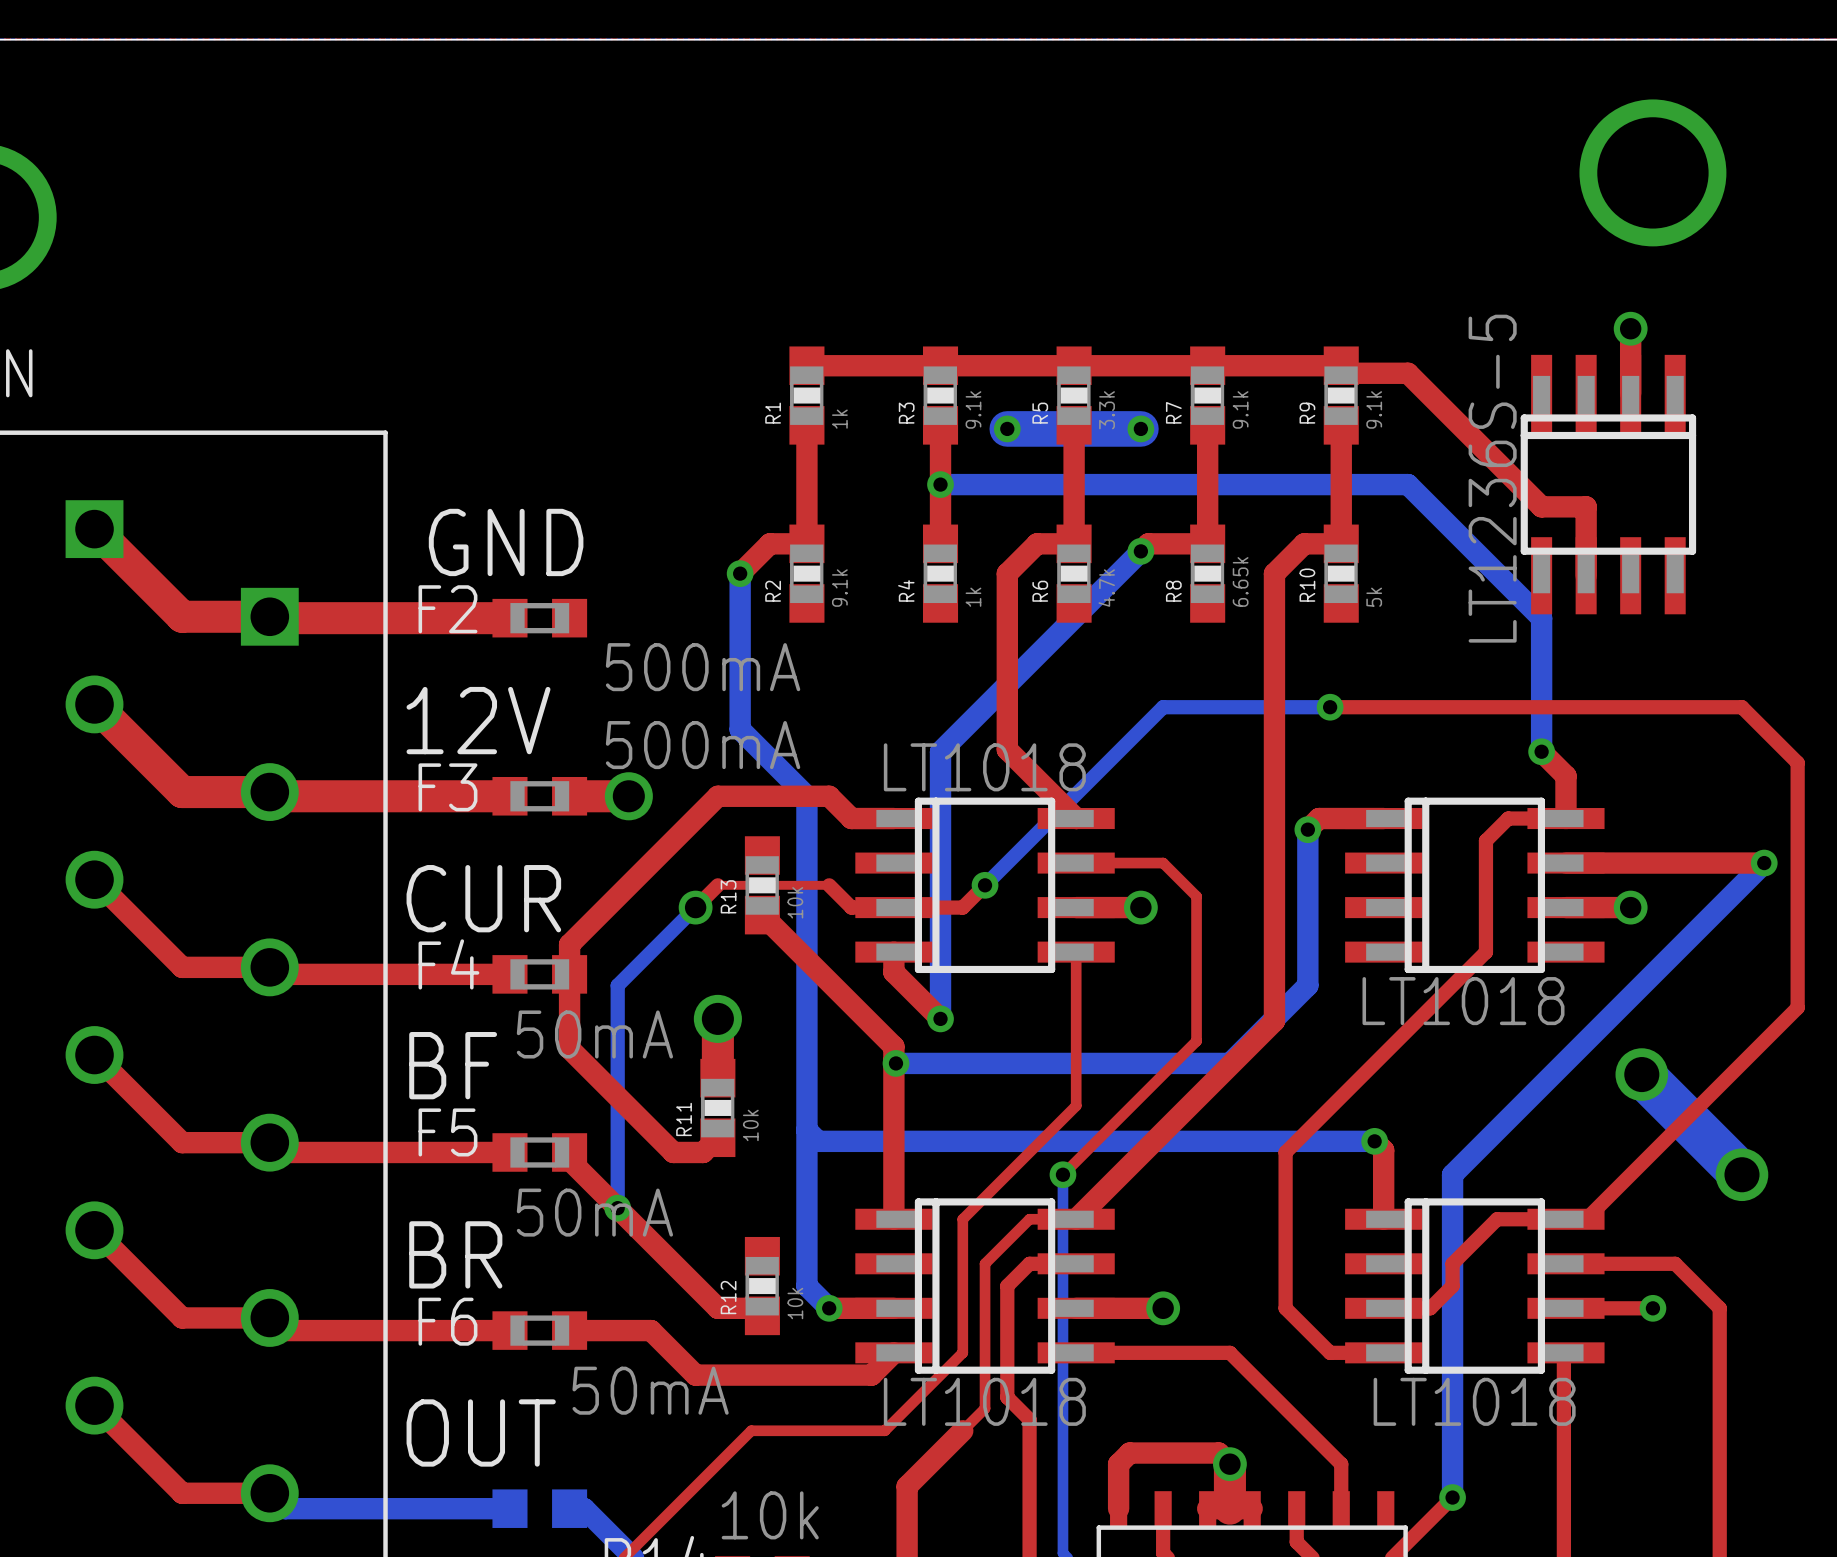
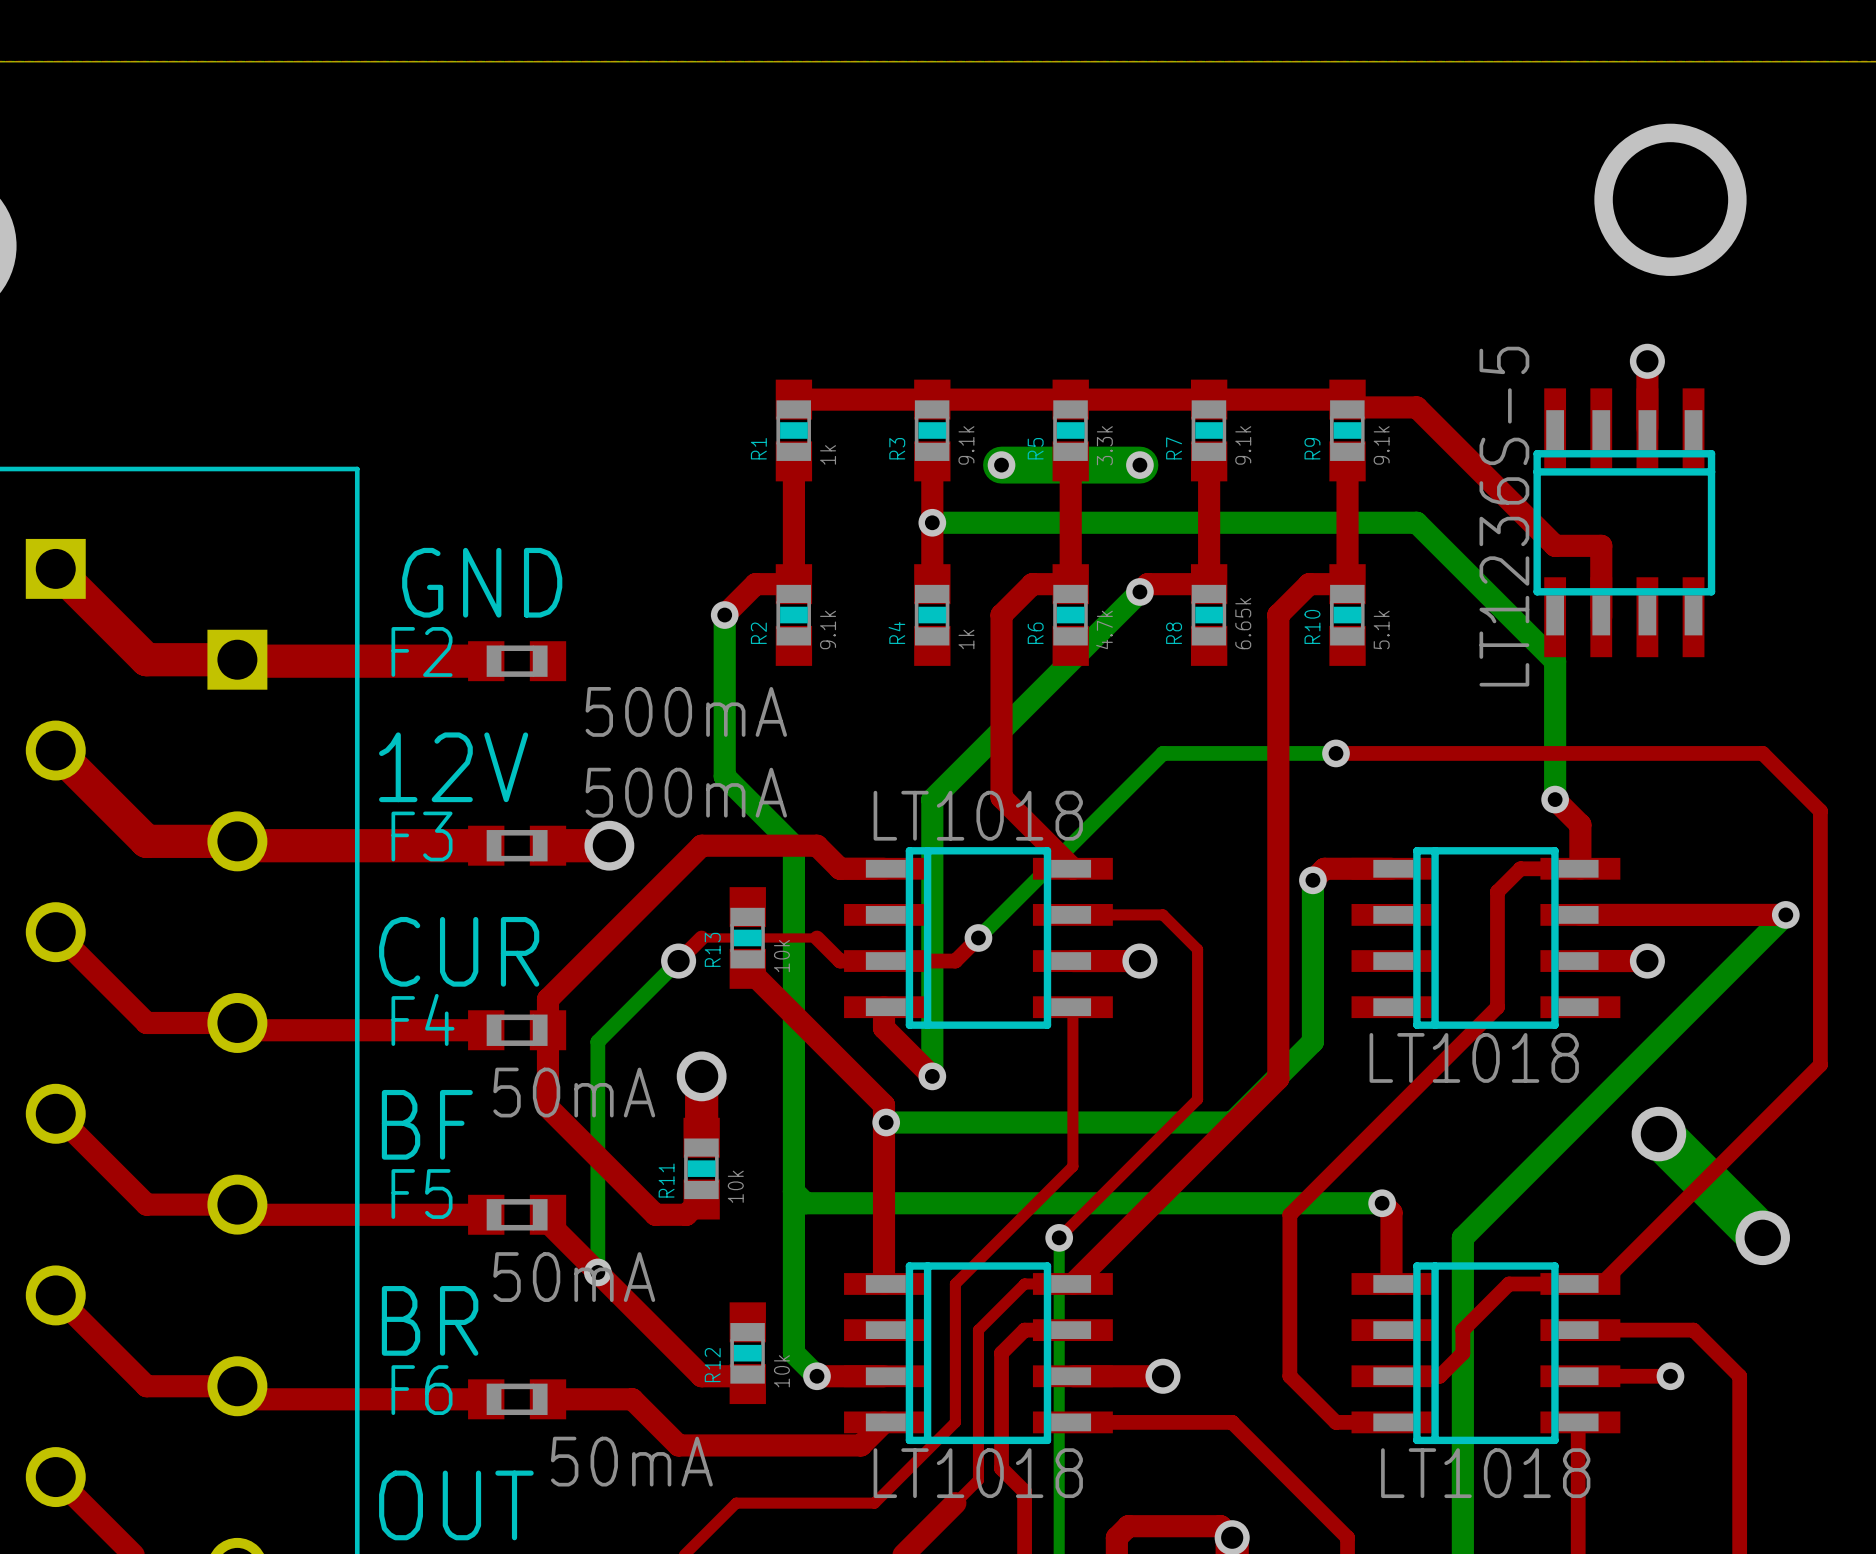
R10 value: 5k (1374, 597) -> 5.1k (1381, 629)

